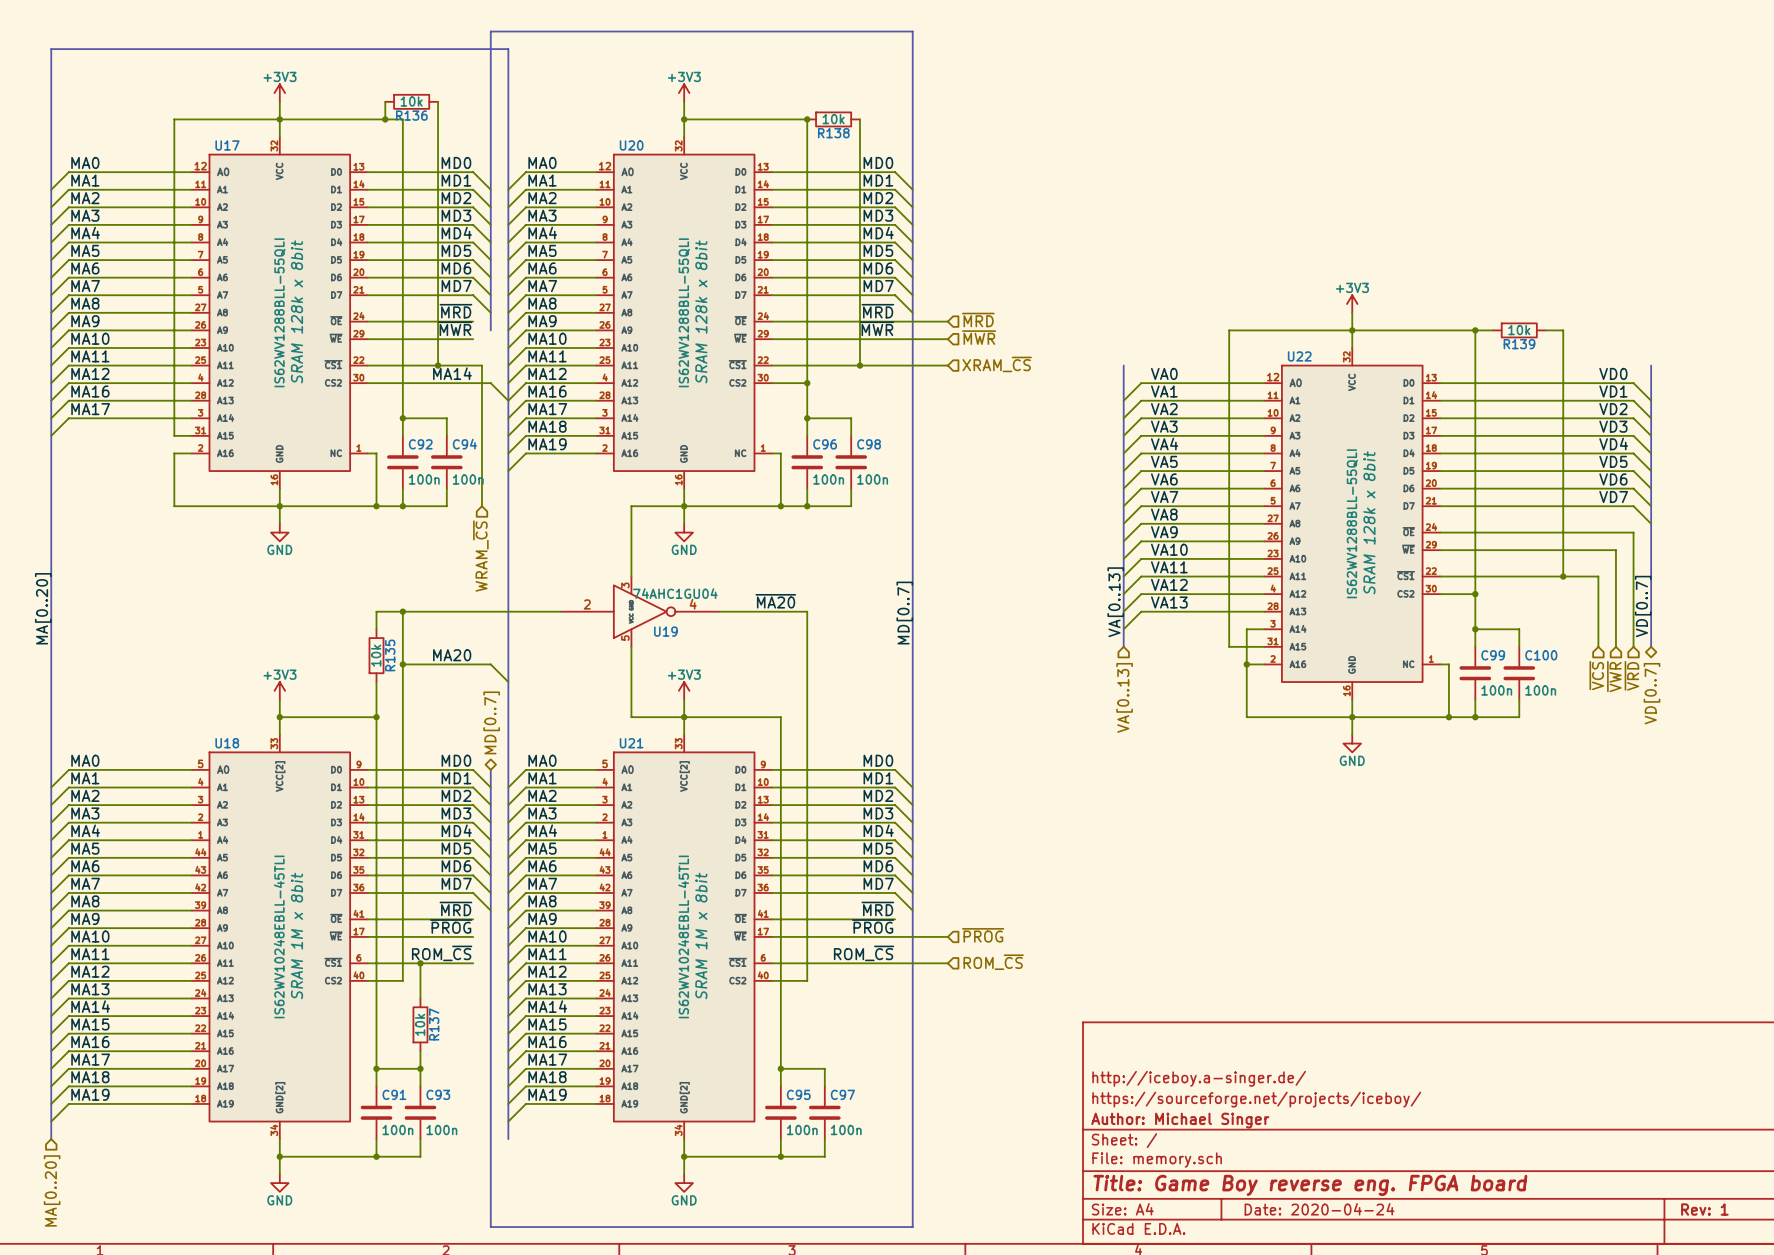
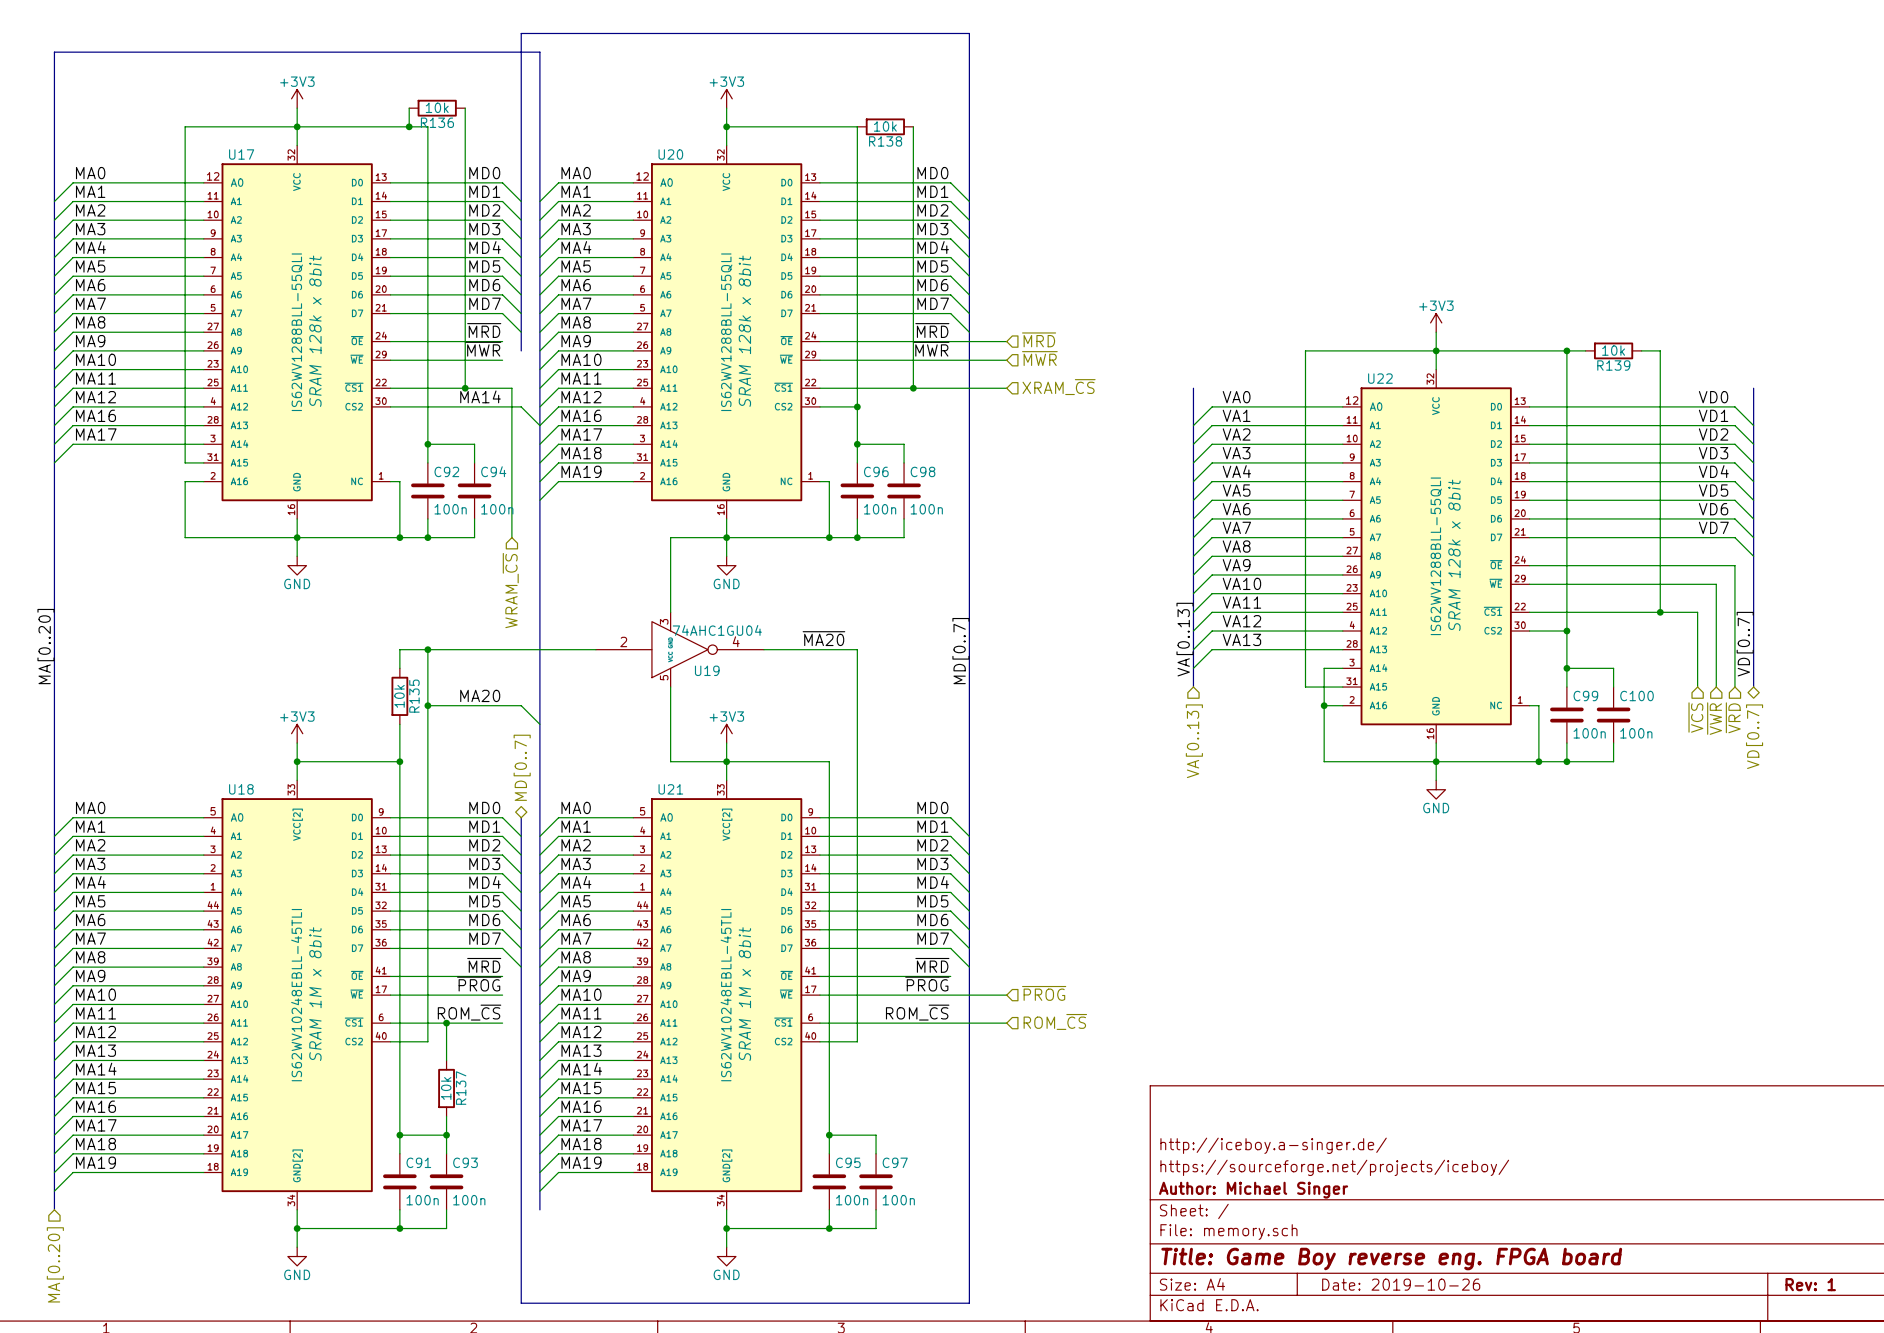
junction: (807, 119) -> none
title block: Date: 2020-04-24 (1319, 1209) -> Date: 2019-10-26 (1401, 1284)

